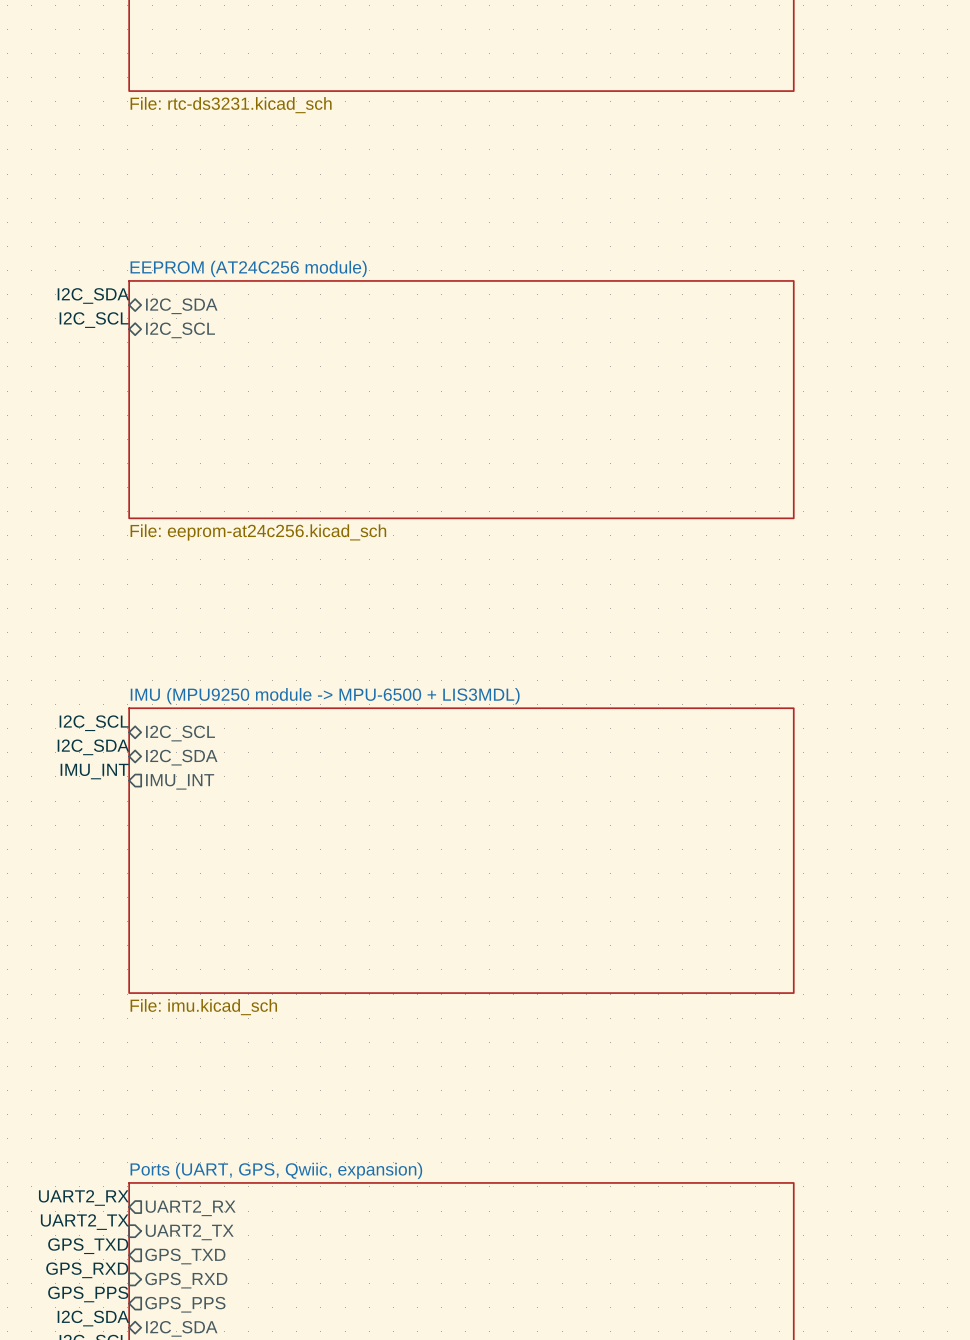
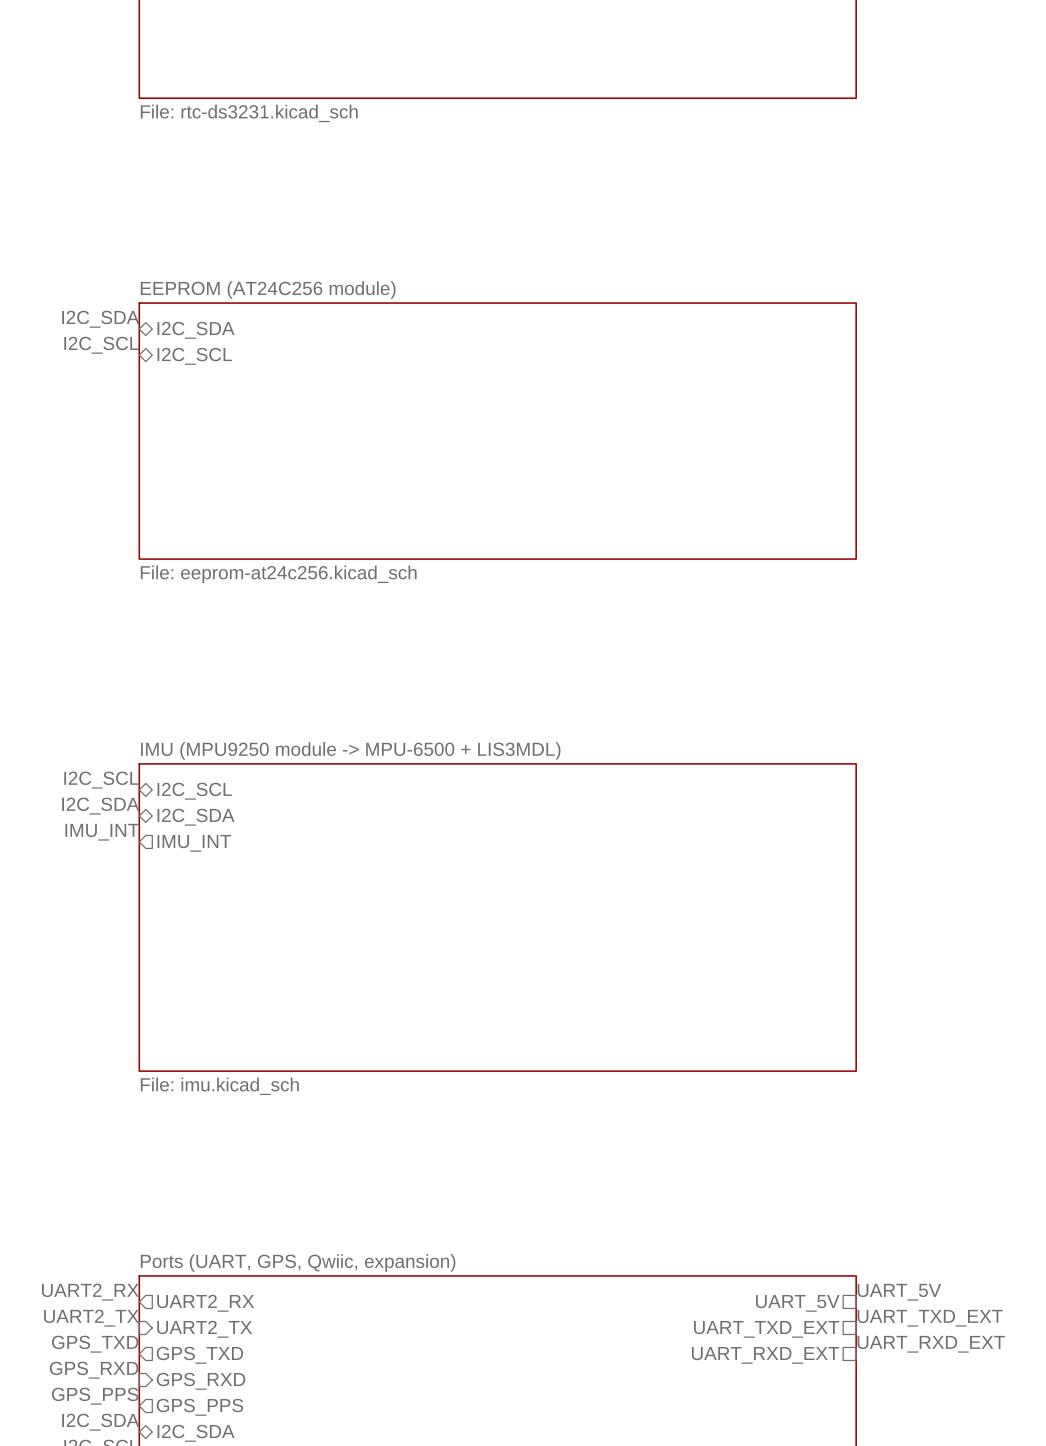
label: none -> UART_5V (899, 1292)
sheet pin: none -> UART_5V (797, 1303)
label: none -> UART_TXD_EXT (930, 1318)
sheet pin: none -> UART_TXD_EXT (766, 1329)
label: none -> UART_RXD_EXT (931, 1344)
sheet pin: none -> UART_RXD_EXT (765, 1355)

